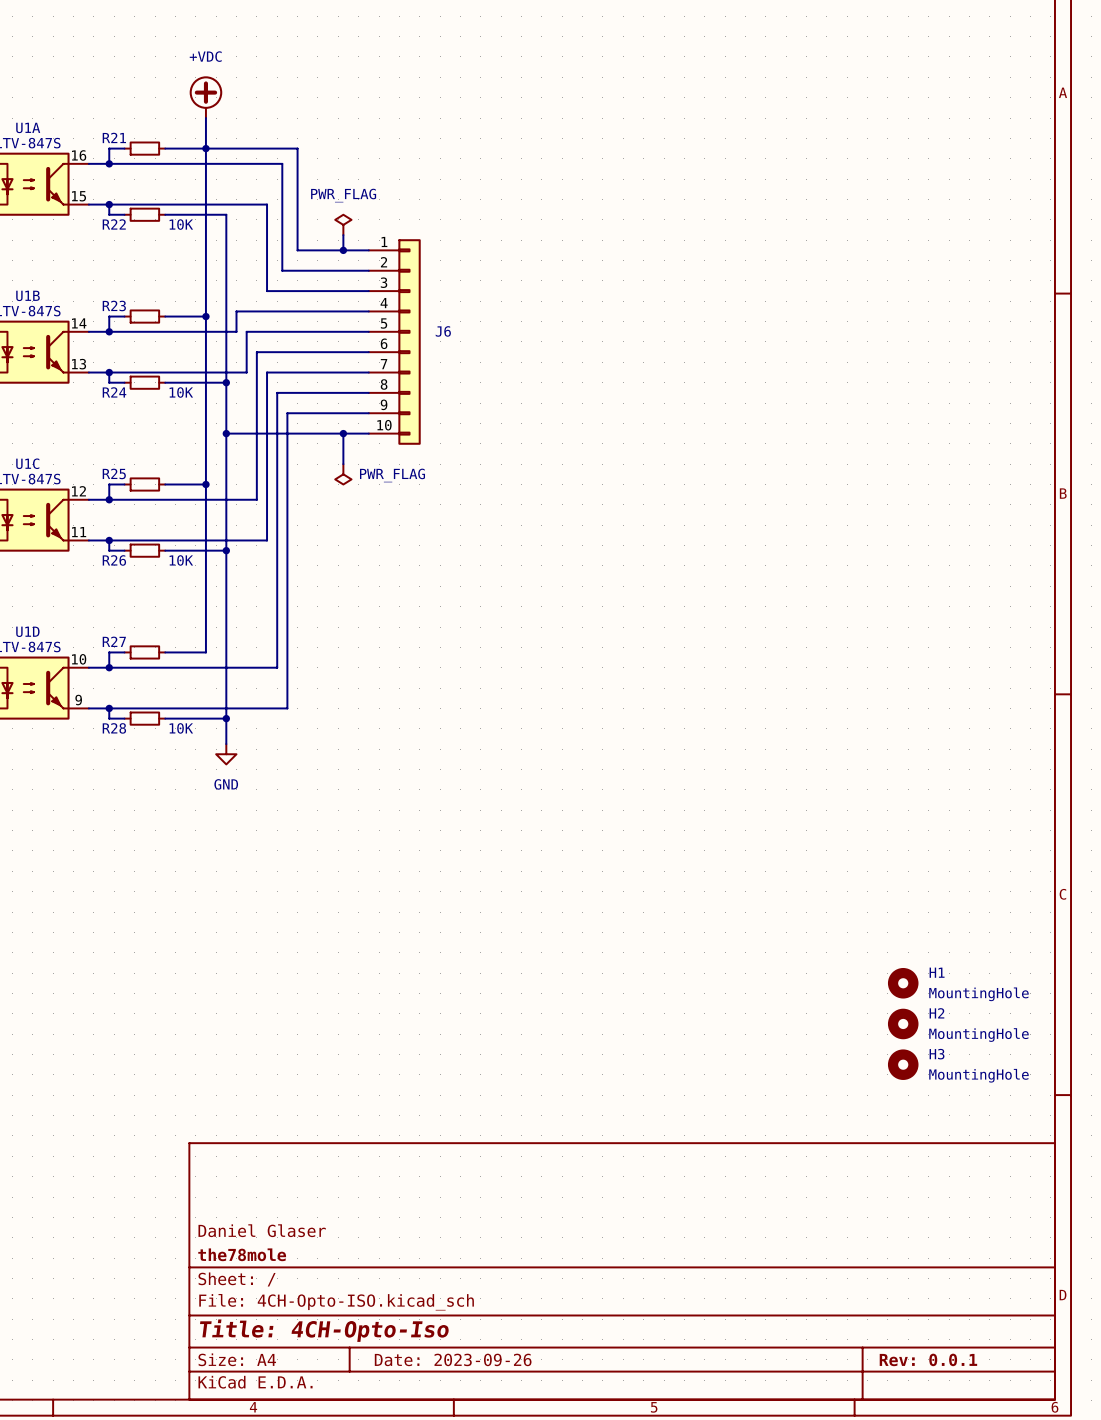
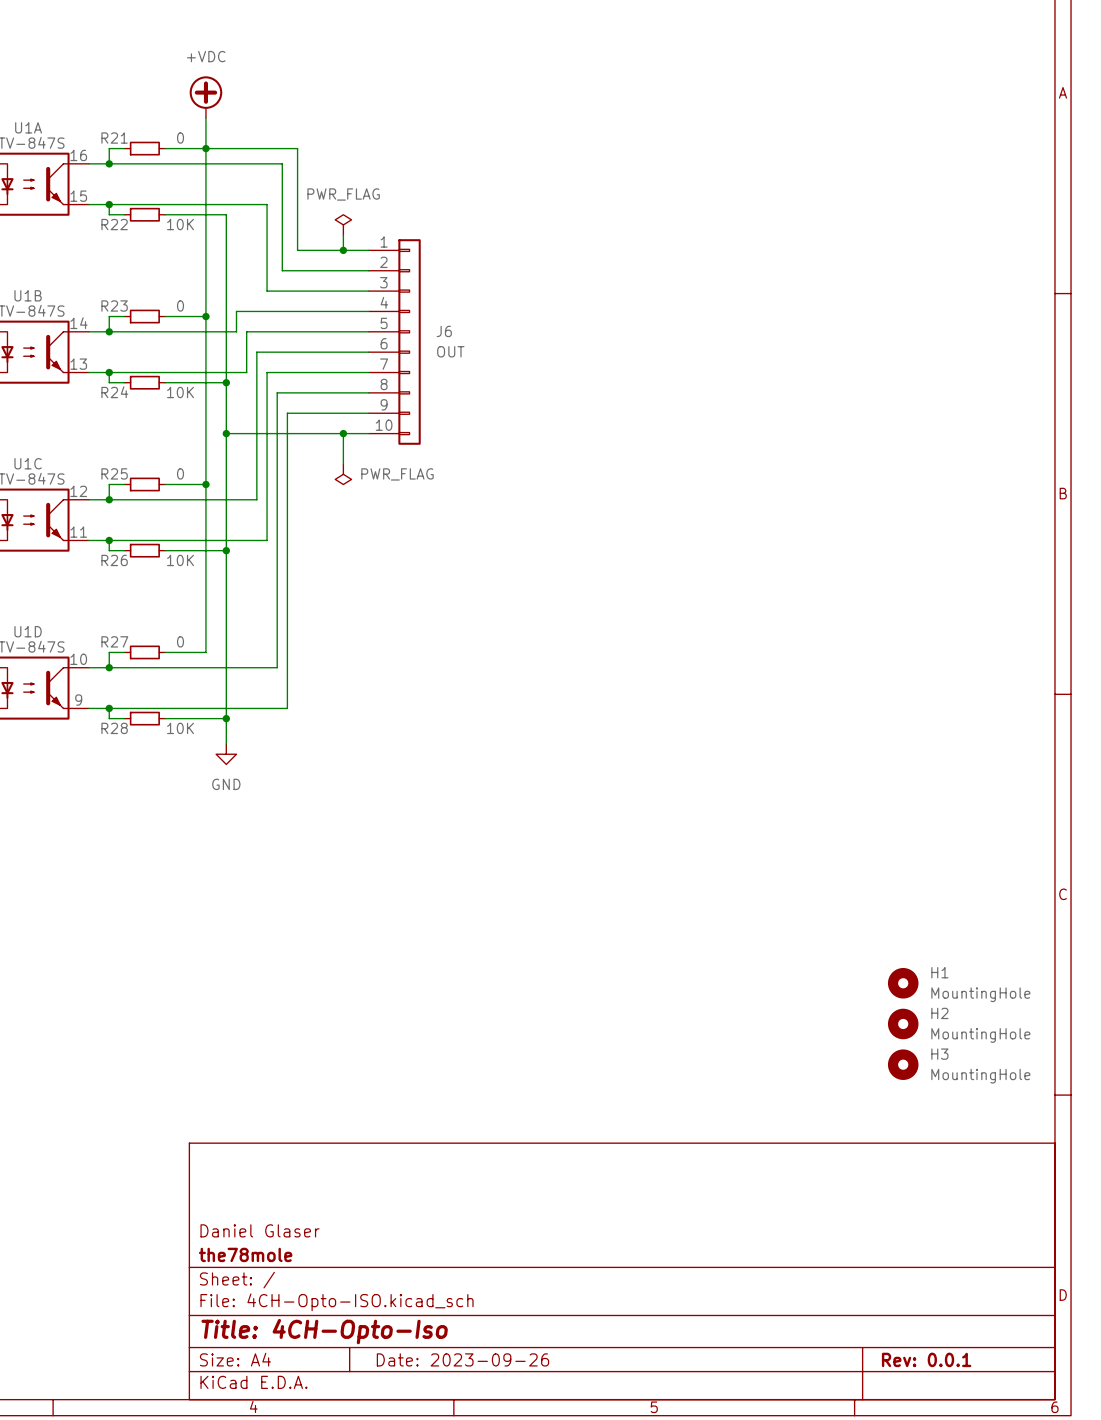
R21 value: none -> 0 (180, 138)
R23 value: none -> 0 (180, 305)
J6 value: none -> OUT (450, 351)
R25 value: none -> 0 (180, 473)
R27 value: none -> 0 (180, 641)

